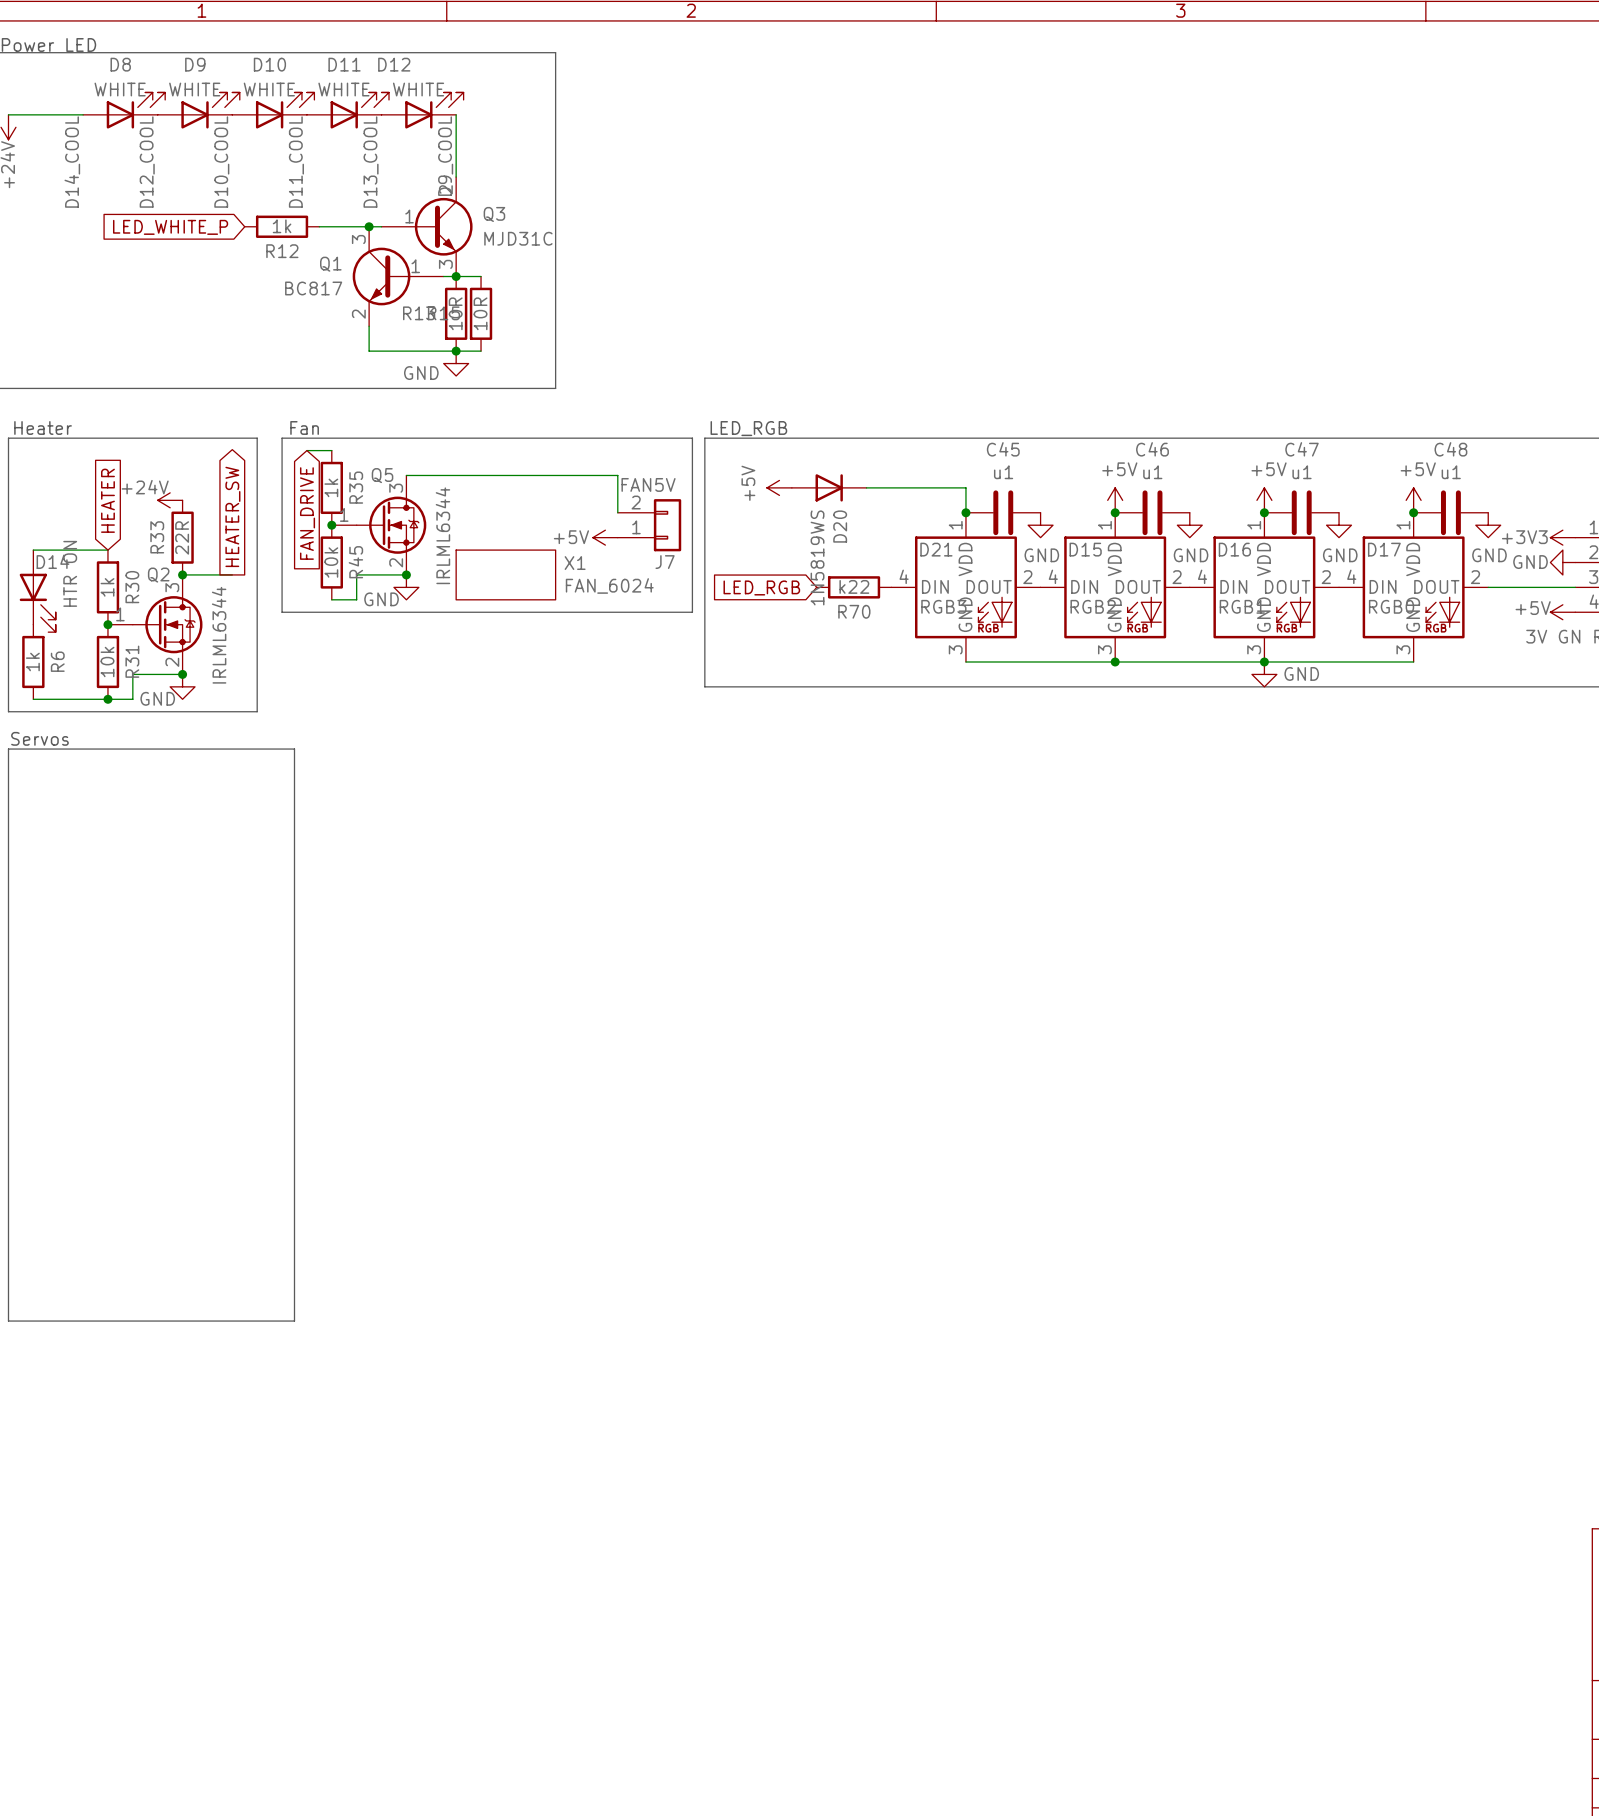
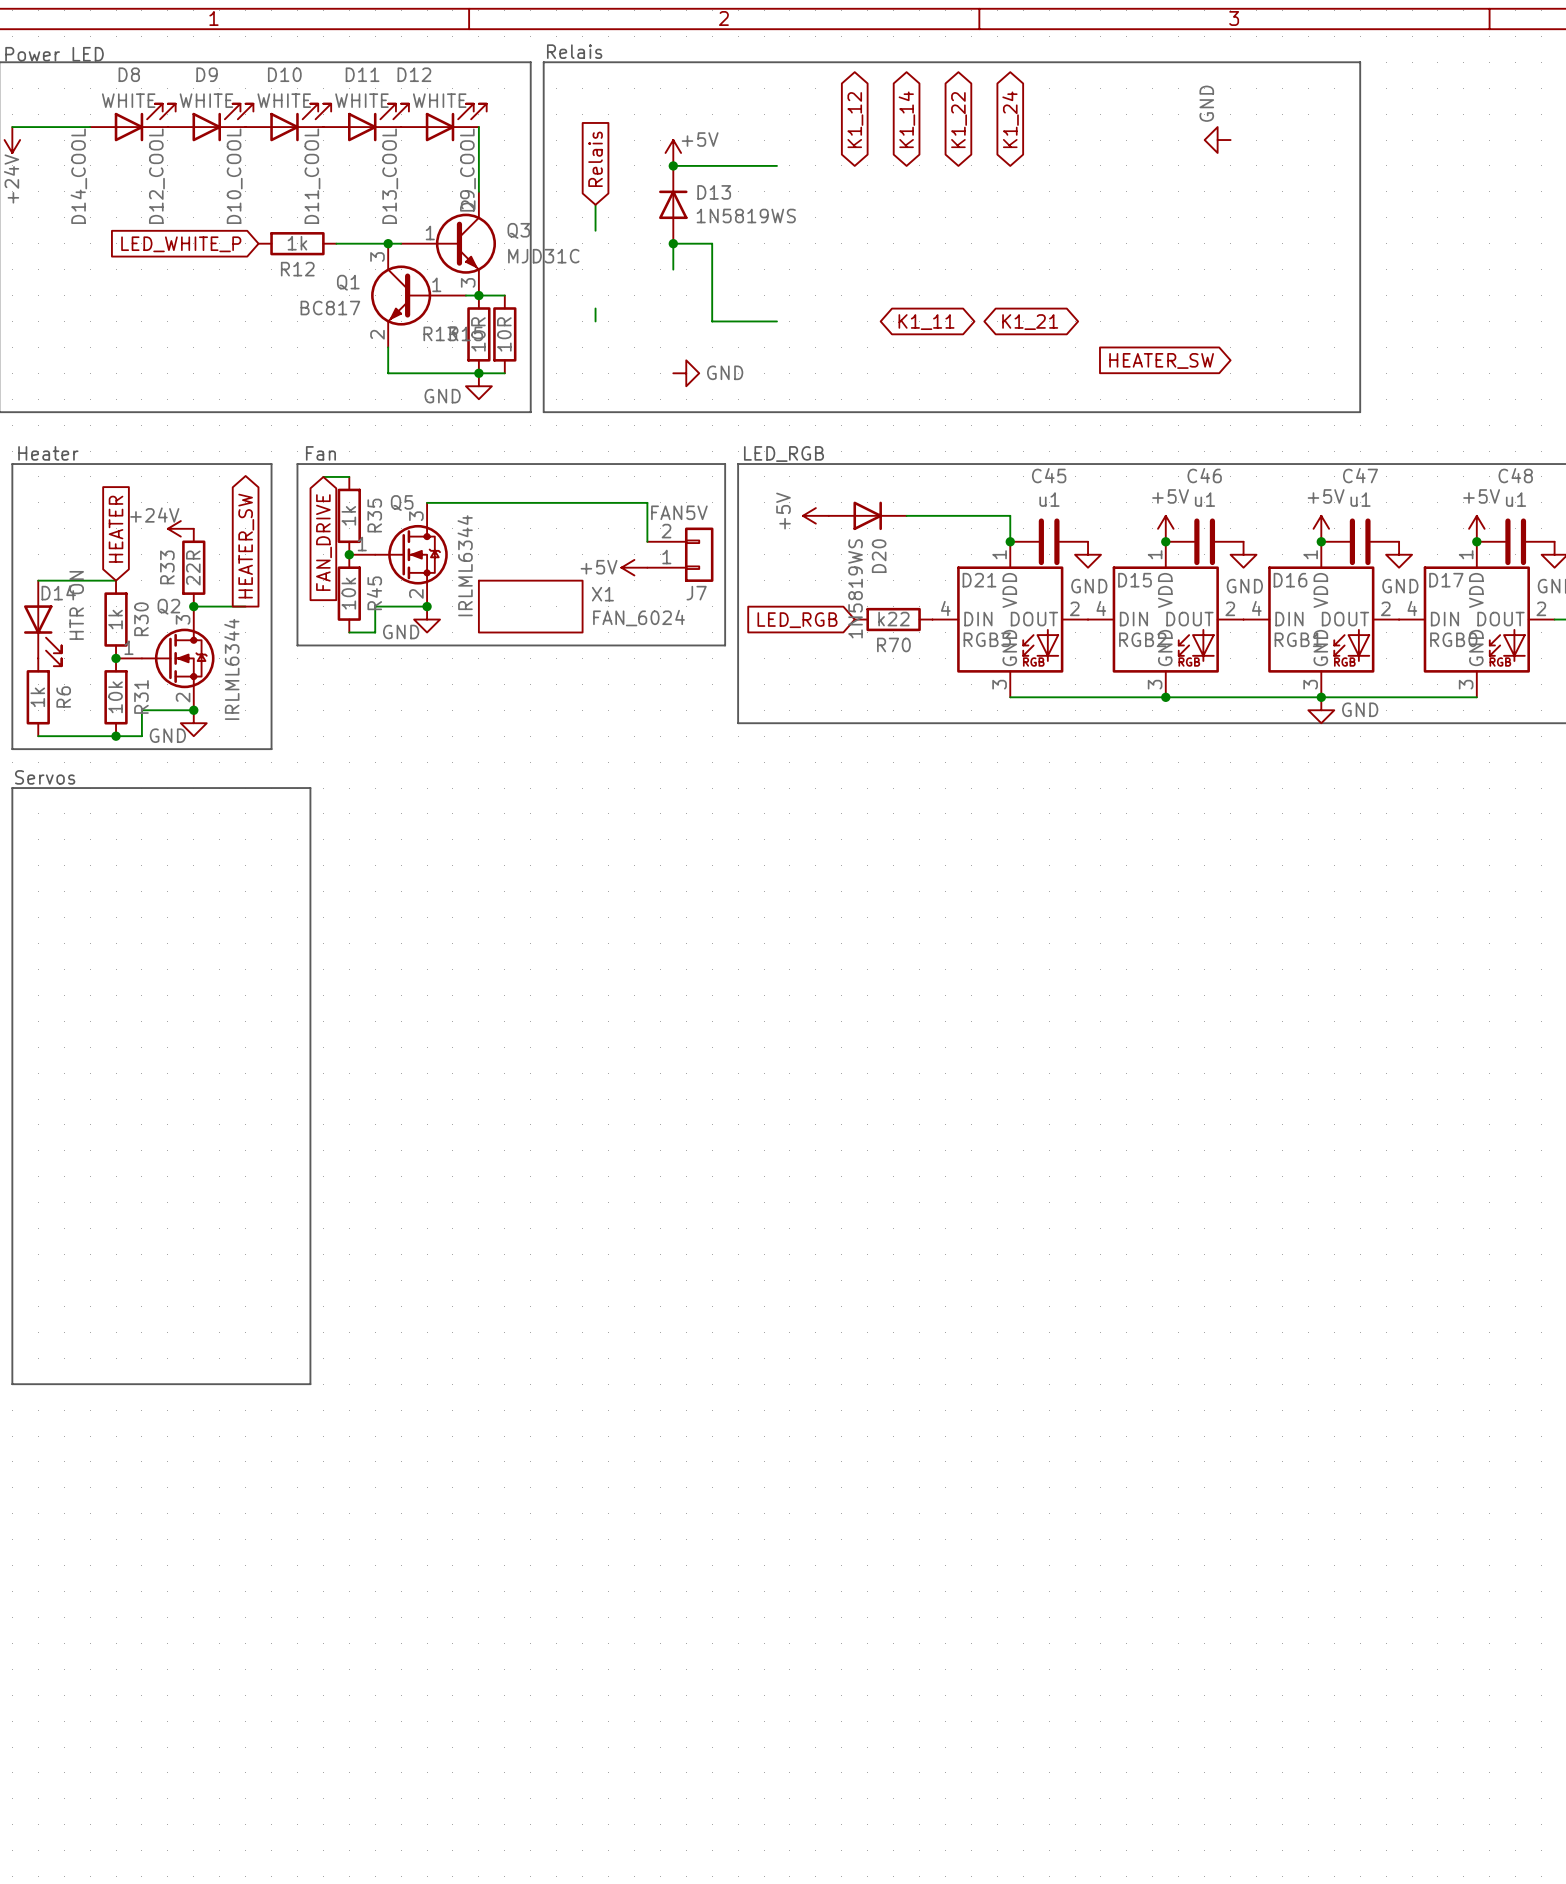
text: none -> Relais (574, 51)
line: (505, 52) (518, 52) -> (530, 62) (530, 412)
line: (555, 52) (555, 388) -> (582, 62) (1360, 62) (1360, 412) (582, 412)
global label: none -> K1_14 (906, 119)
global label: none -> K1_24 (1010, 119)
global label: none -> K1_12 (855, 120)
global label: none -> K1_22 (959, 120)
power symbol: none -> GND (1217, 140)
power symbol: none -> +5V (673, 152)
global label: none -> Relais (595, 159)
wire: none -> (673, 165) (776, 165)
junction: none -> (673, 165)
wire: none -> (595, 204) (595, 230)
D13: none -> 1N5819WS (673, 204)
junction: none -> (673, 243)
wire: none -> (673, 269) (673, 243) (712, 243) (712, 321) (776, 321)
wire: none -> (595, 308) (595, 321)
global label: none -> K1_11 (926, 322)
global label: none -> K1_21 (1030, 322)
global label: none -> HEATER_SW (1161, 360)
power symbol: none -> GND (686, 373)
line: (505, 388) (518, 388) -> (543, 62) (543, 412)

